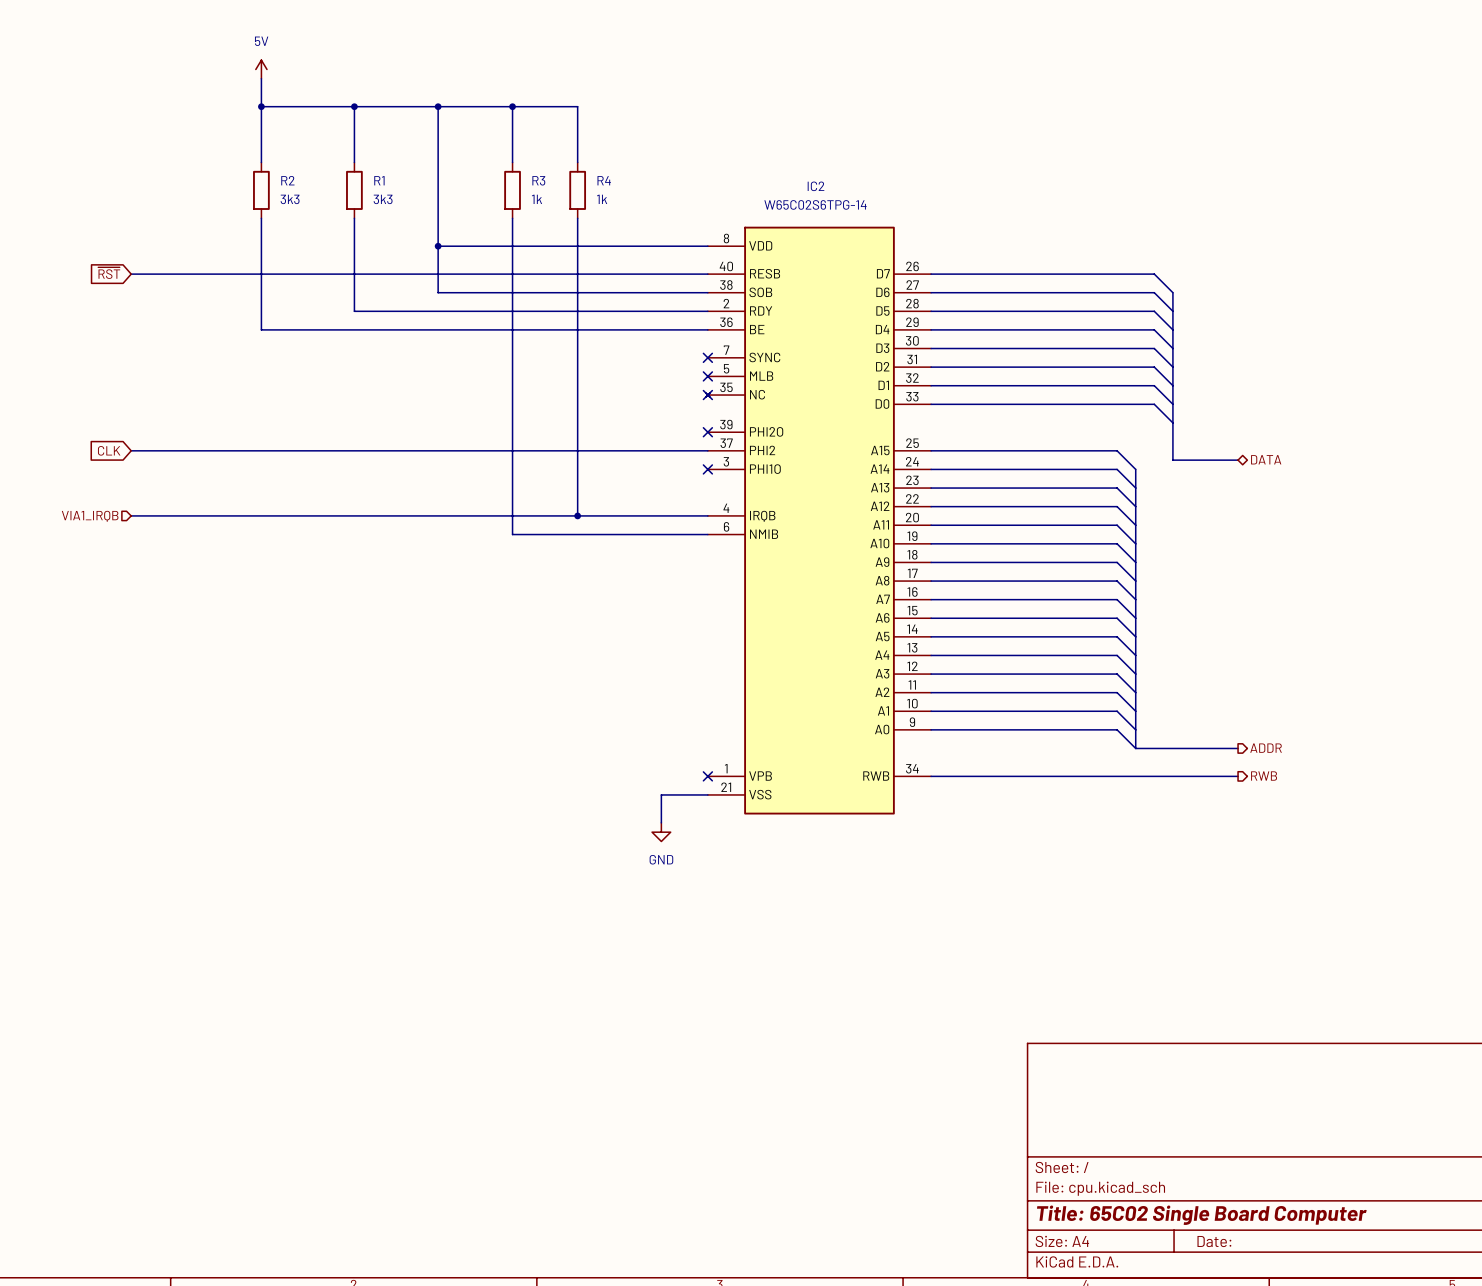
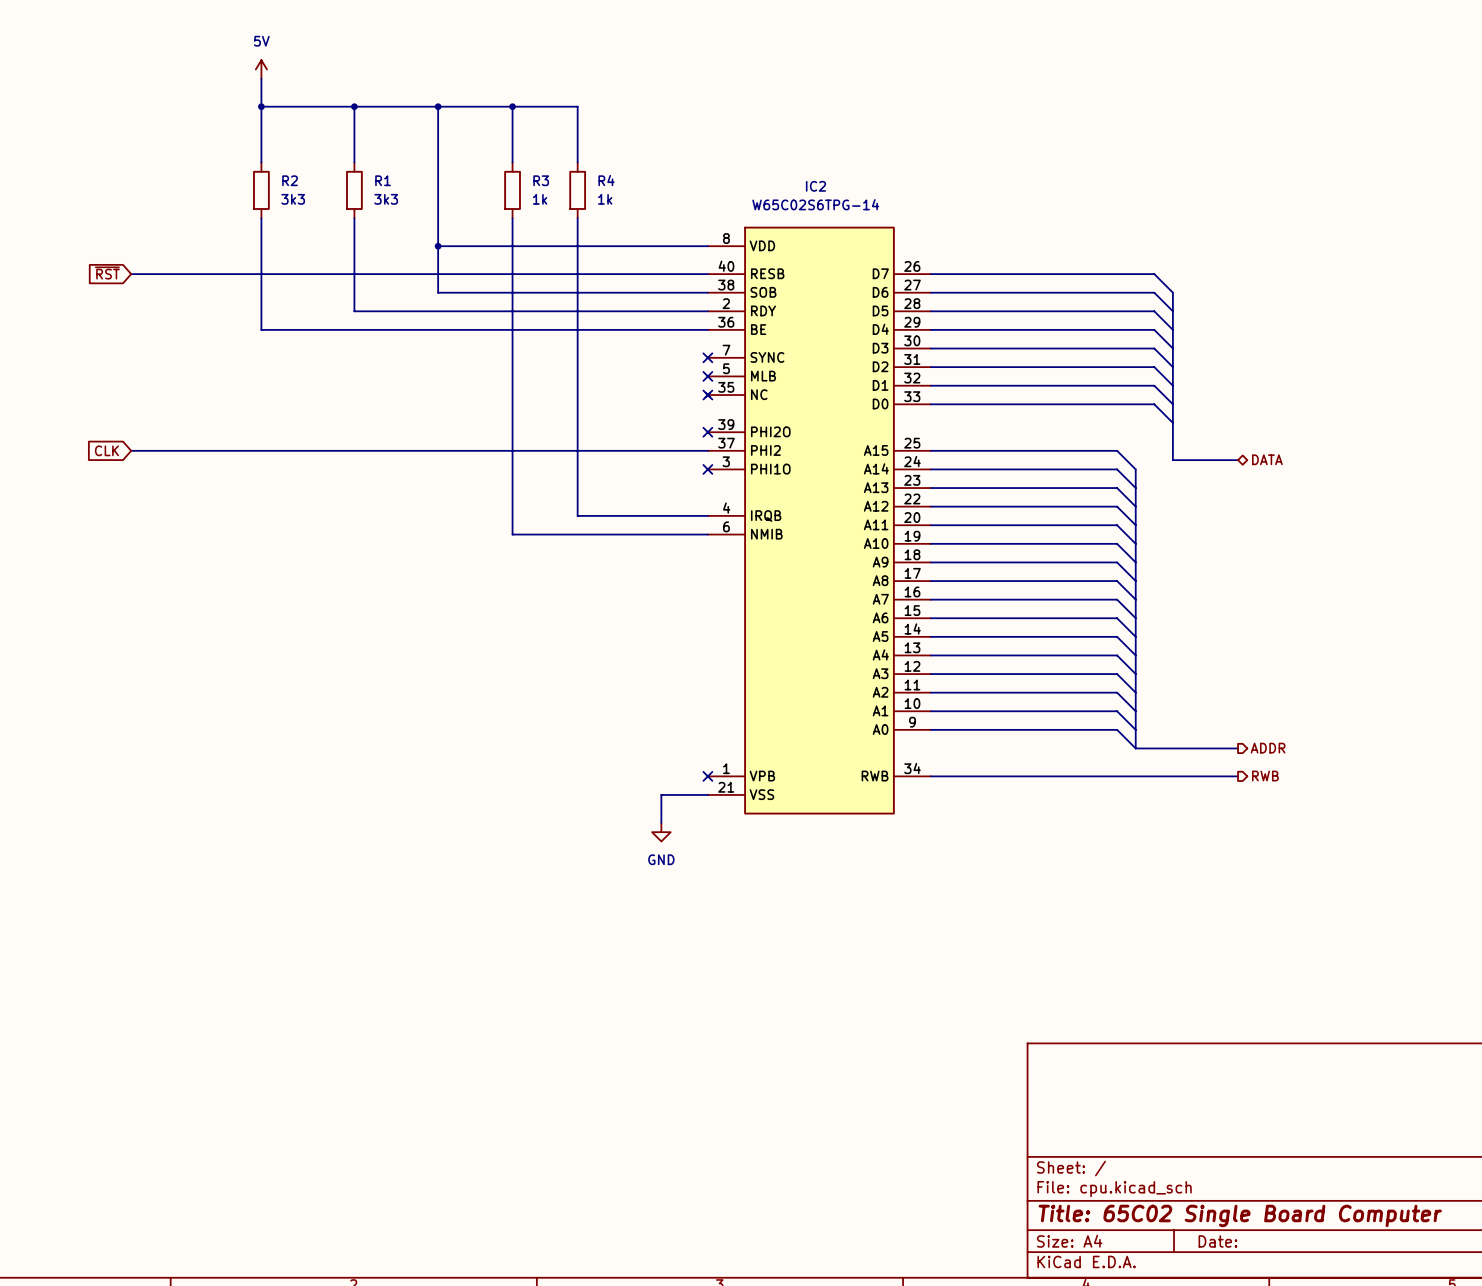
wire: (131, 515) (577, 515) -> none
junction: (577, 515) -> none
hierarchical label: VIA1_IRQB (90, 516) -> none

